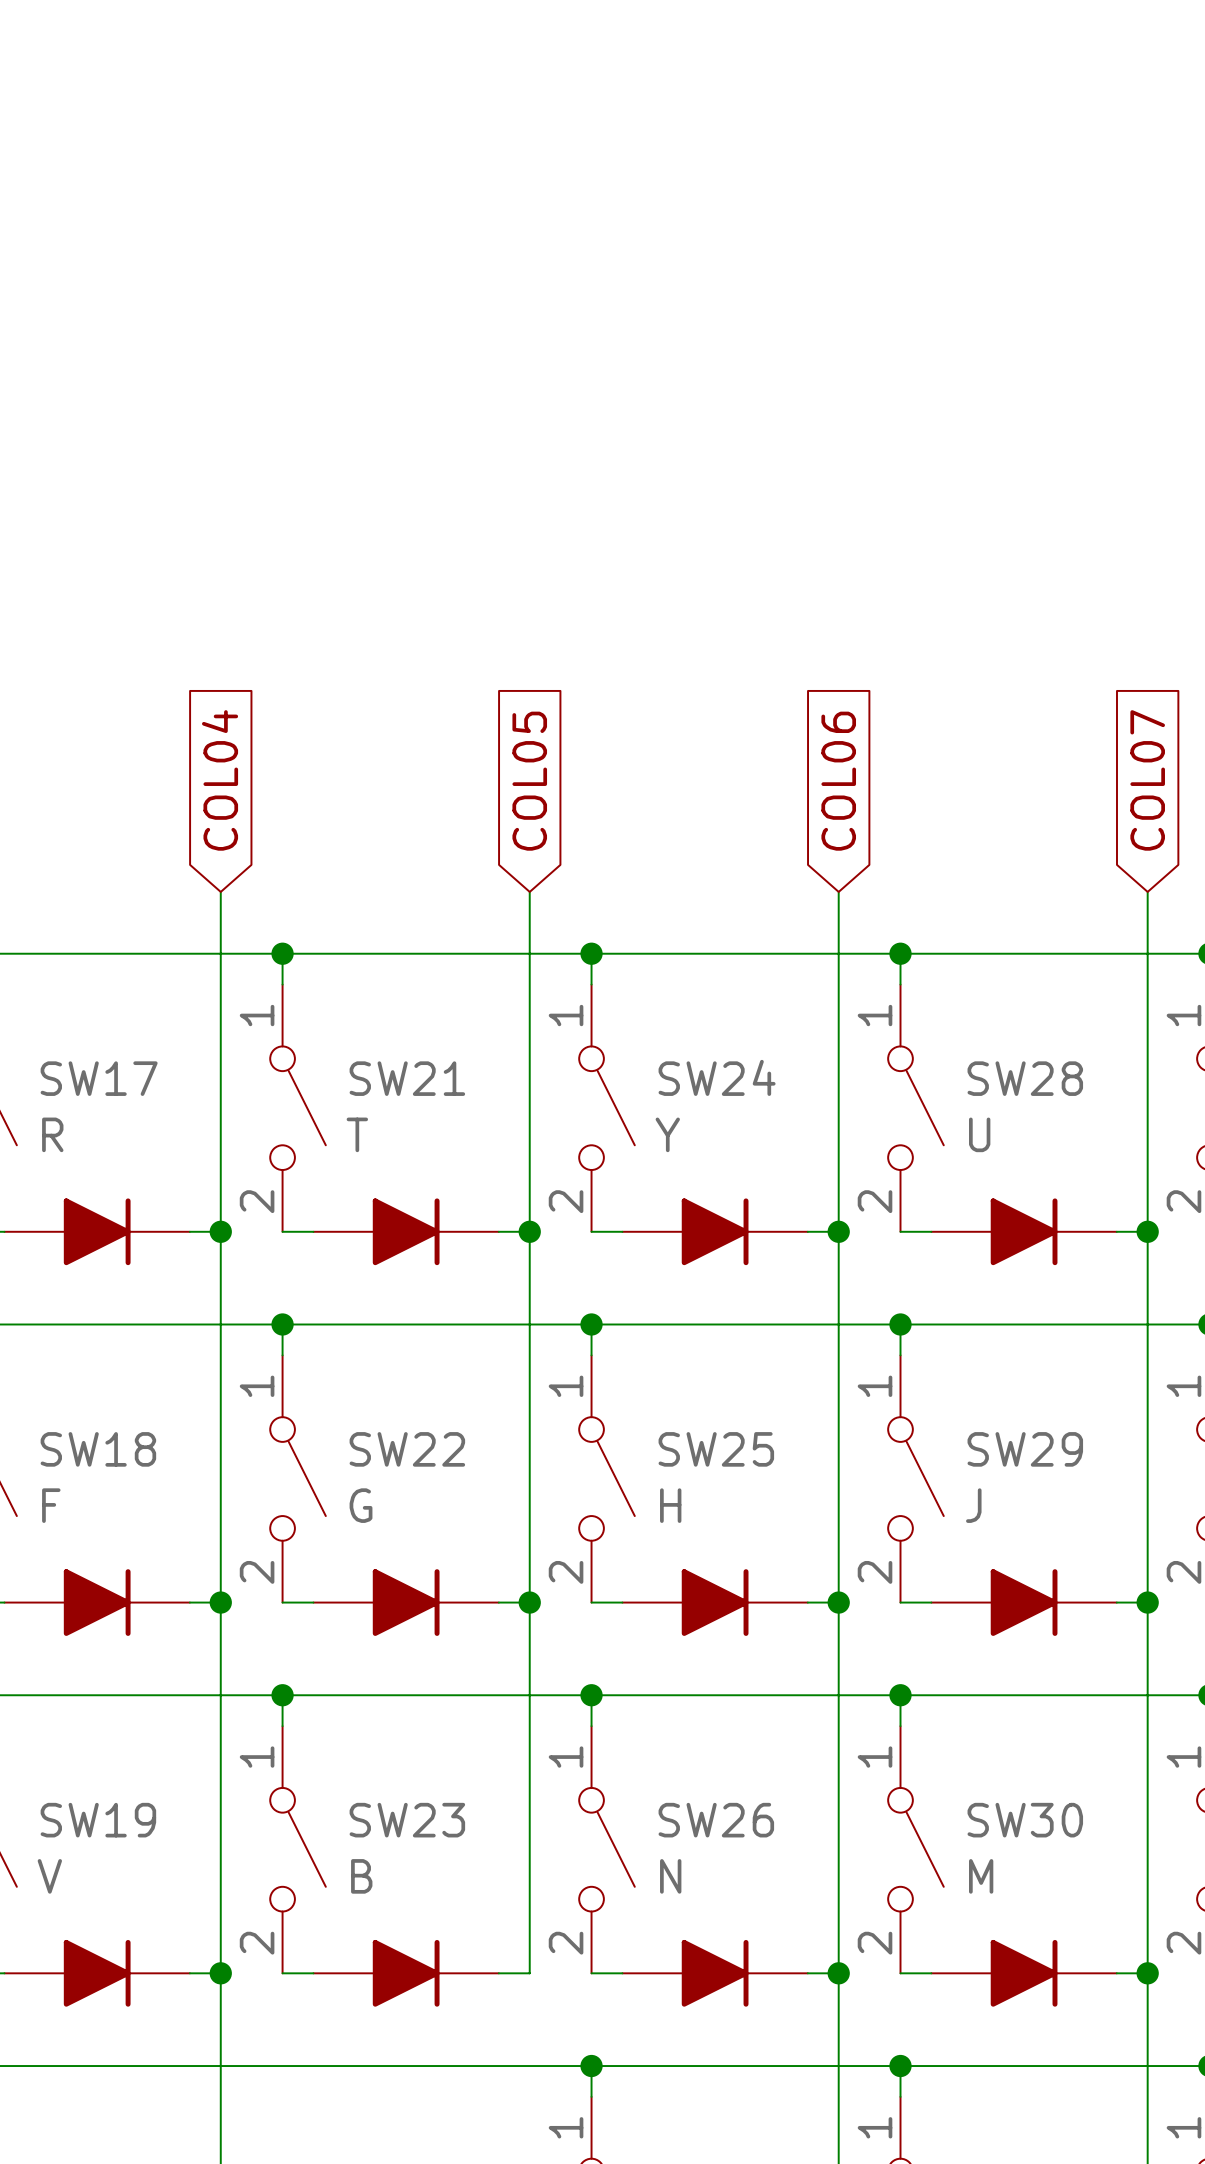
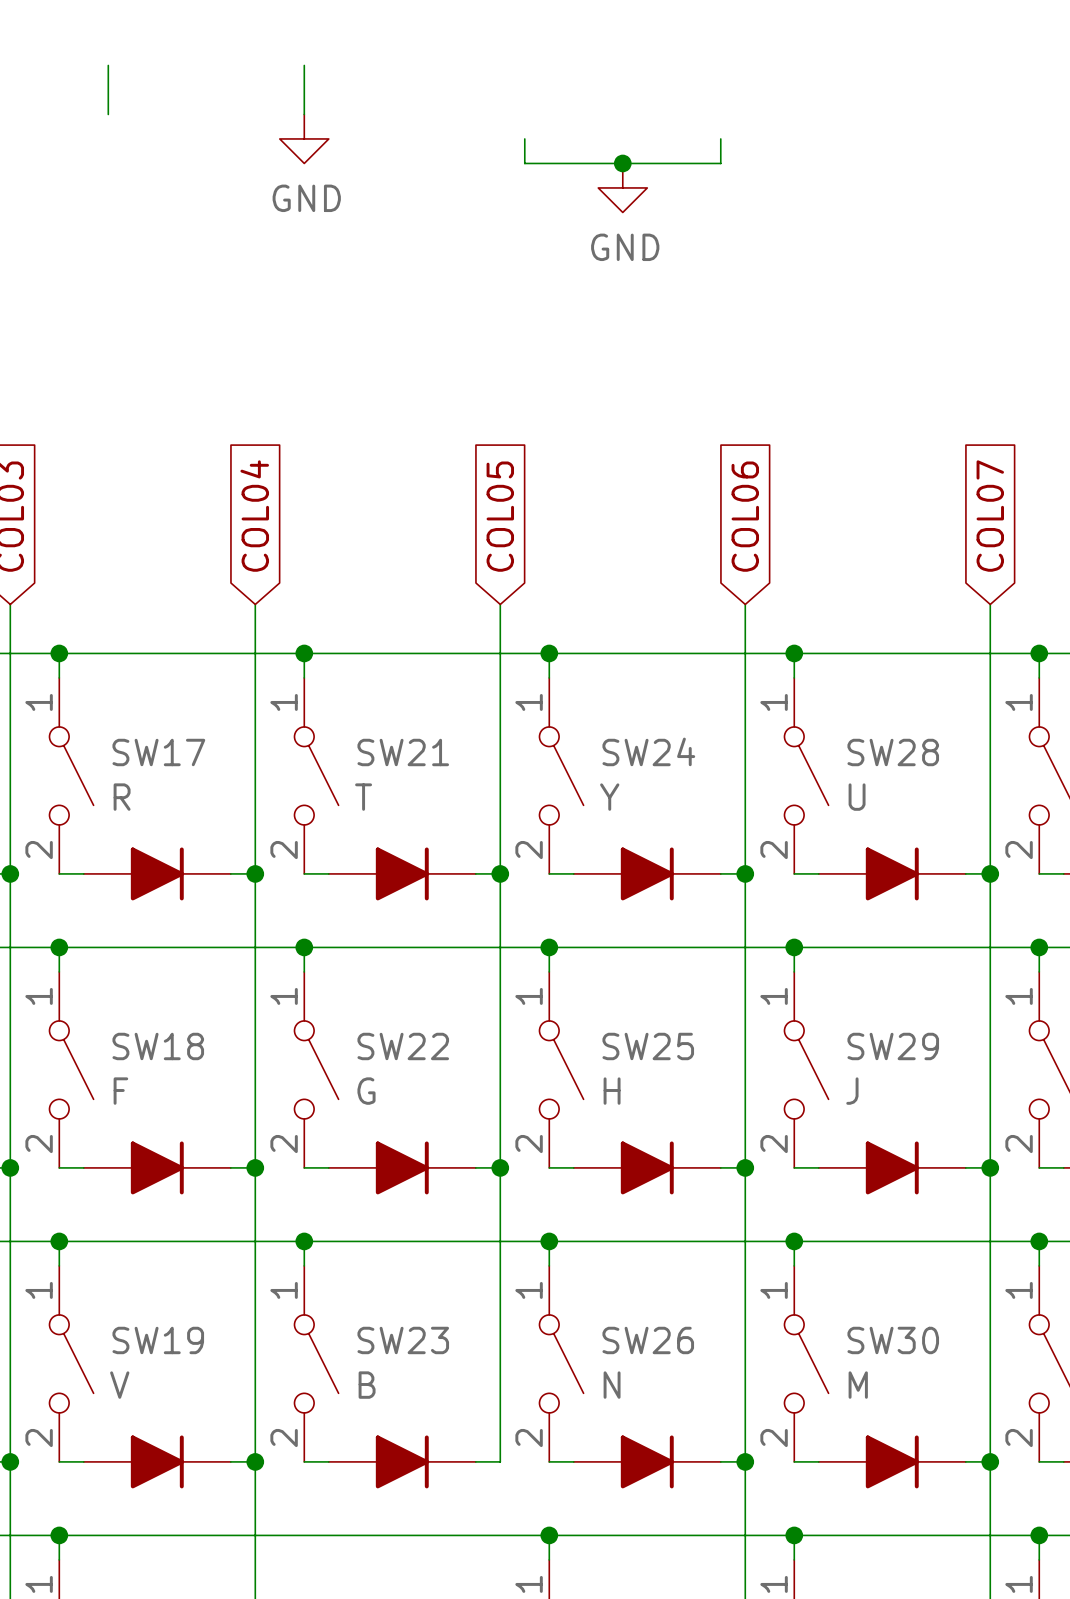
wire: none -> (108, 65) (108, 114)
wire: none -> (304, 65) (304, 114)
power symbol: none -> GND (304, 138)
wire: none -> (524, 138) (524, 163) (720, 163) (720, 138)
junction: none -> (622, 163)
power symbol: none -> GND (622, 187)

